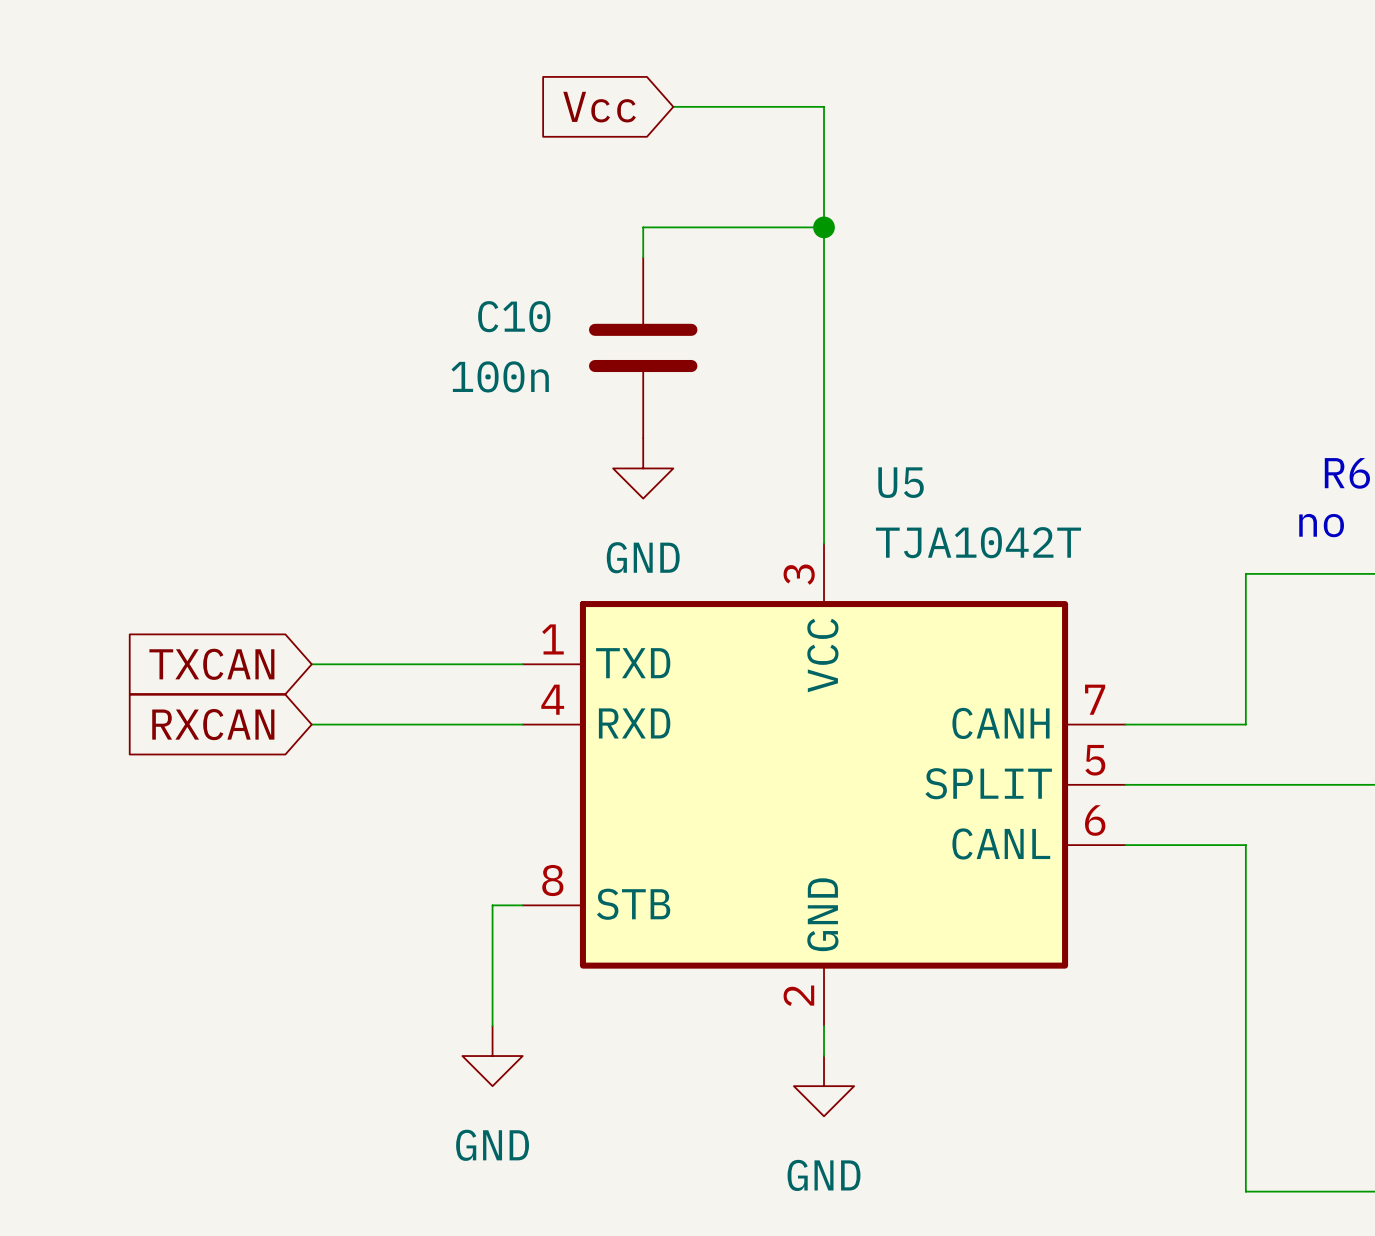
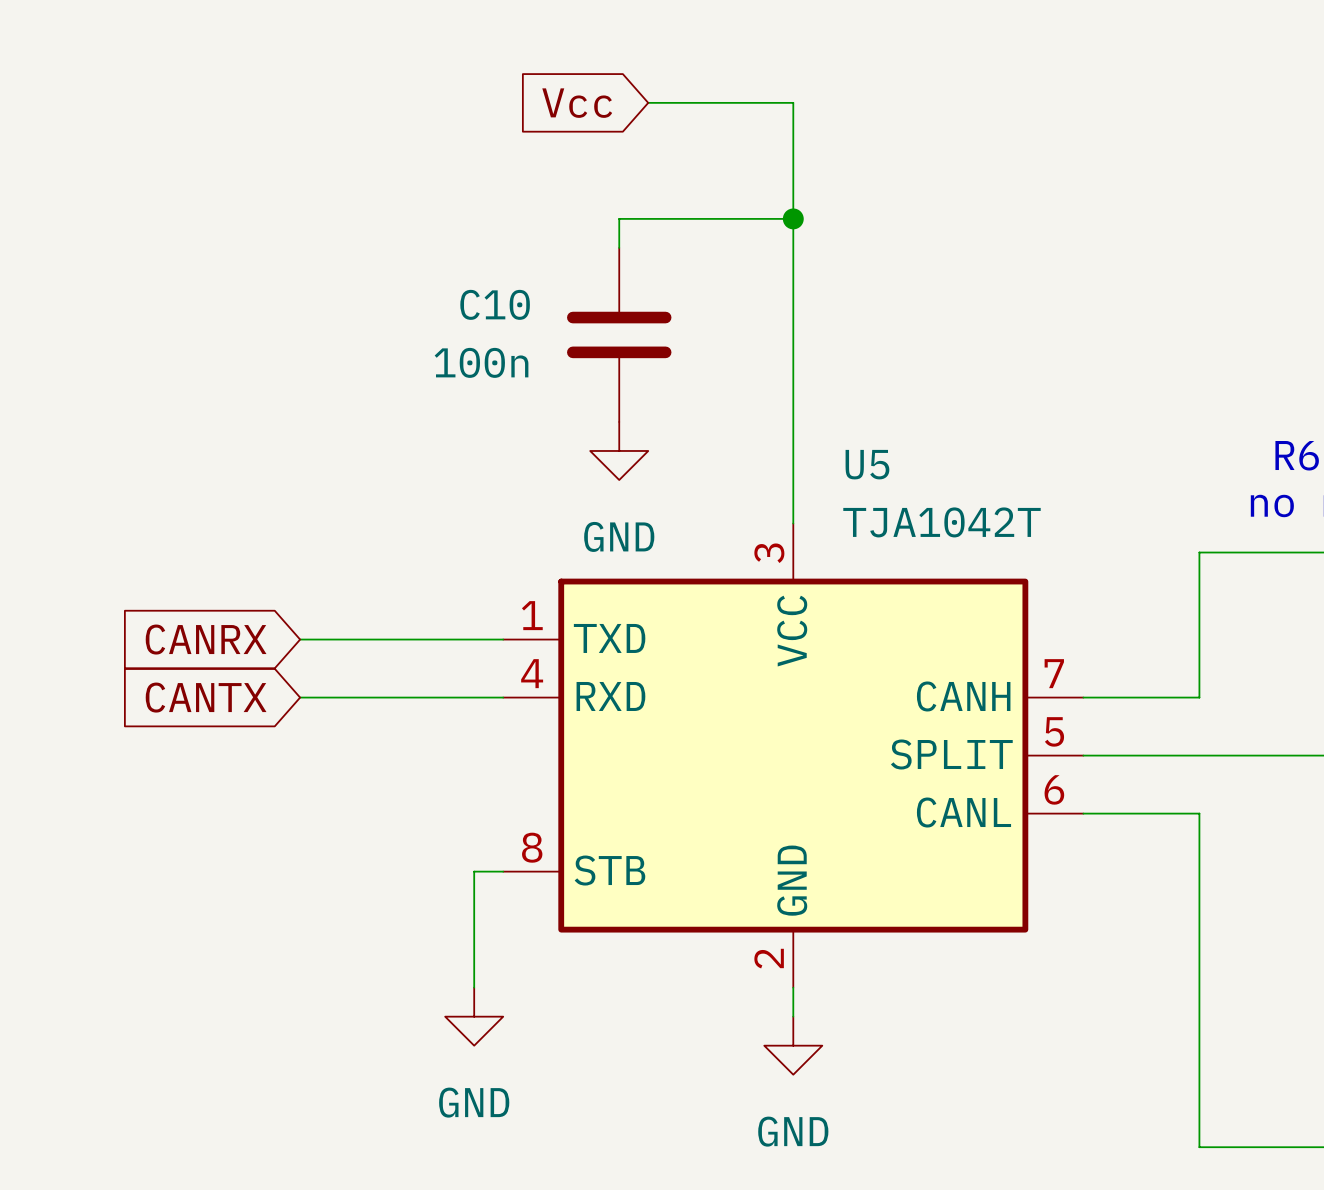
global label: TXCAN (211, 664) -> CANRX (206, 639)
global label: RXCAN (213, 724) -> CANTX (206, 697)

